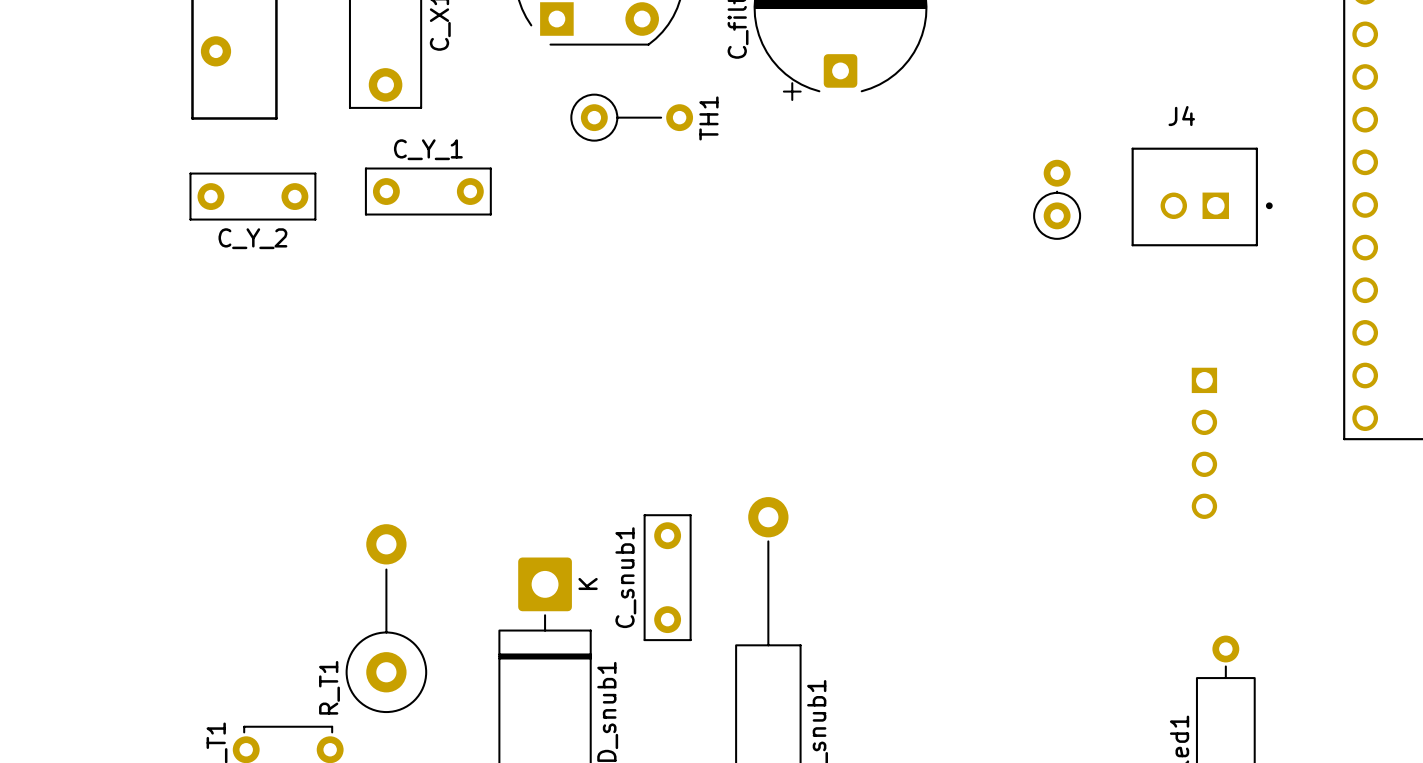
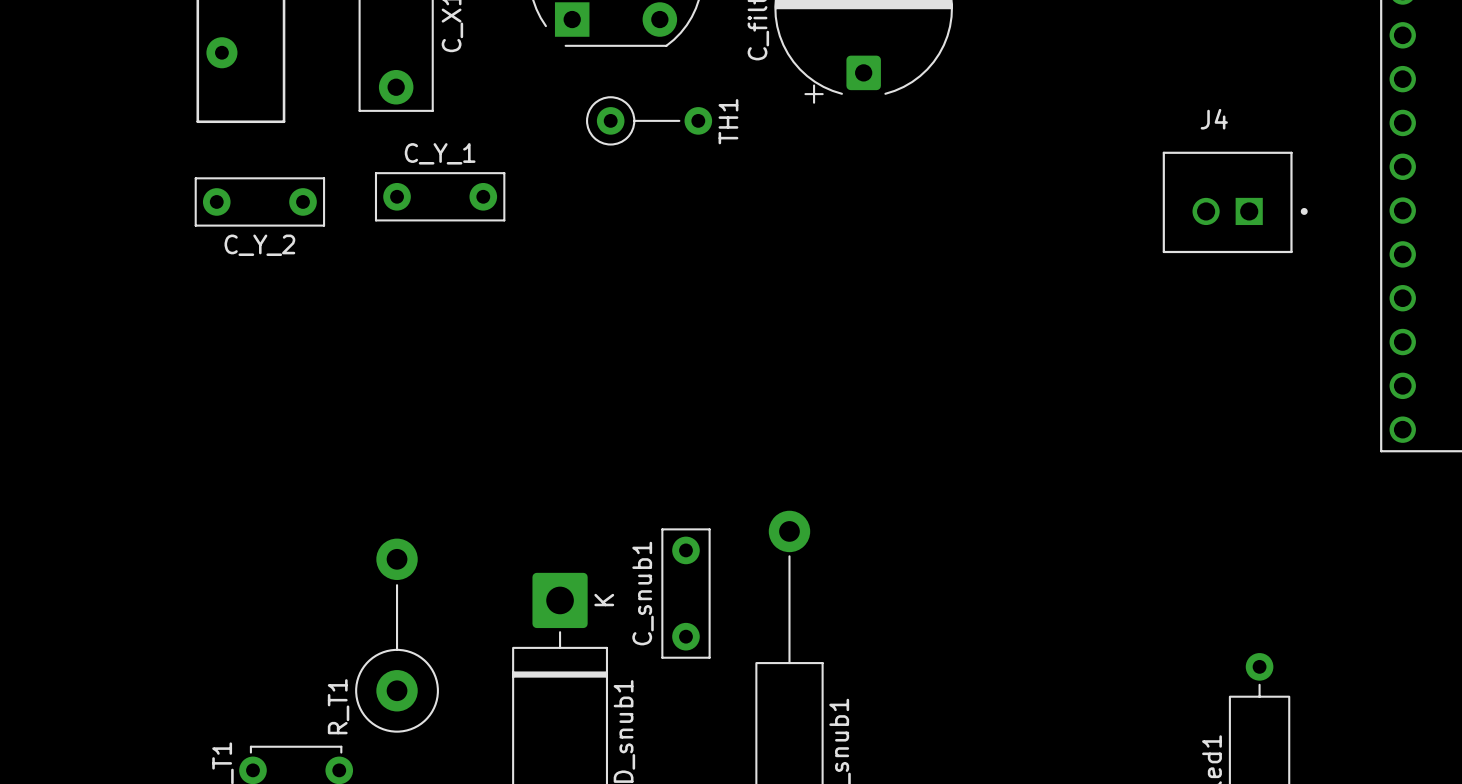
part: (1057, 199) -> none
part: (1204, 443) -> none

